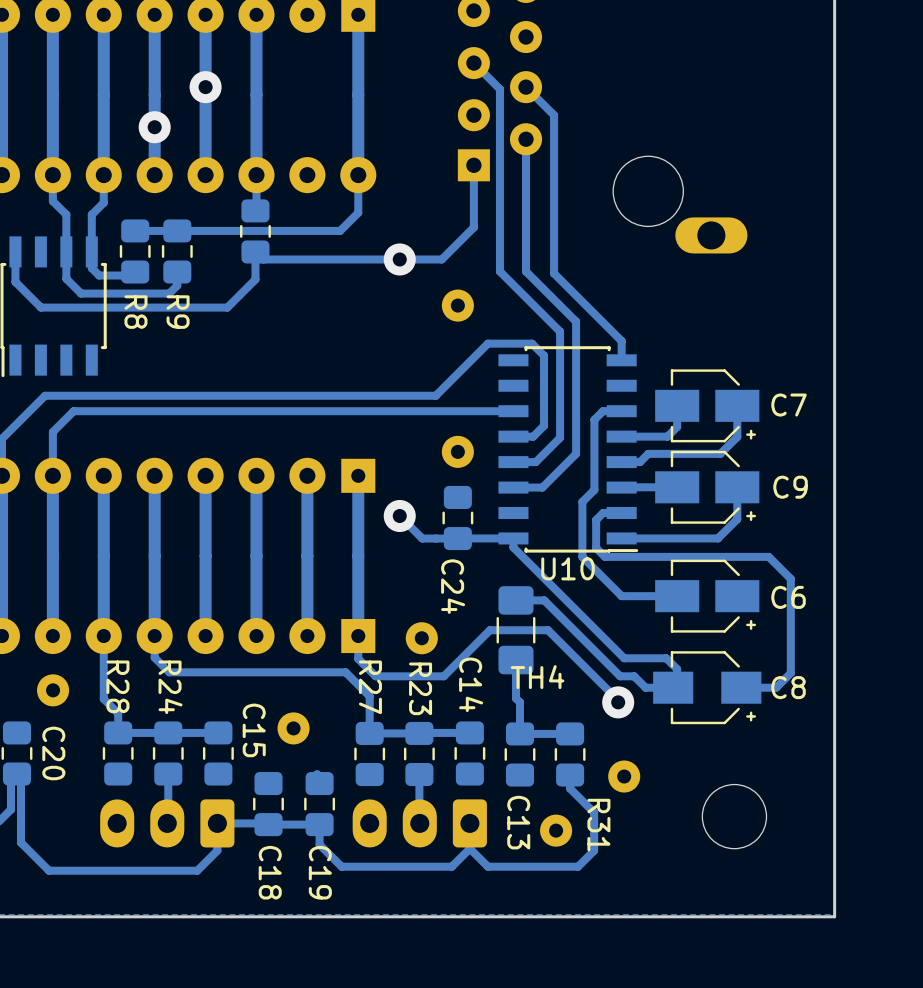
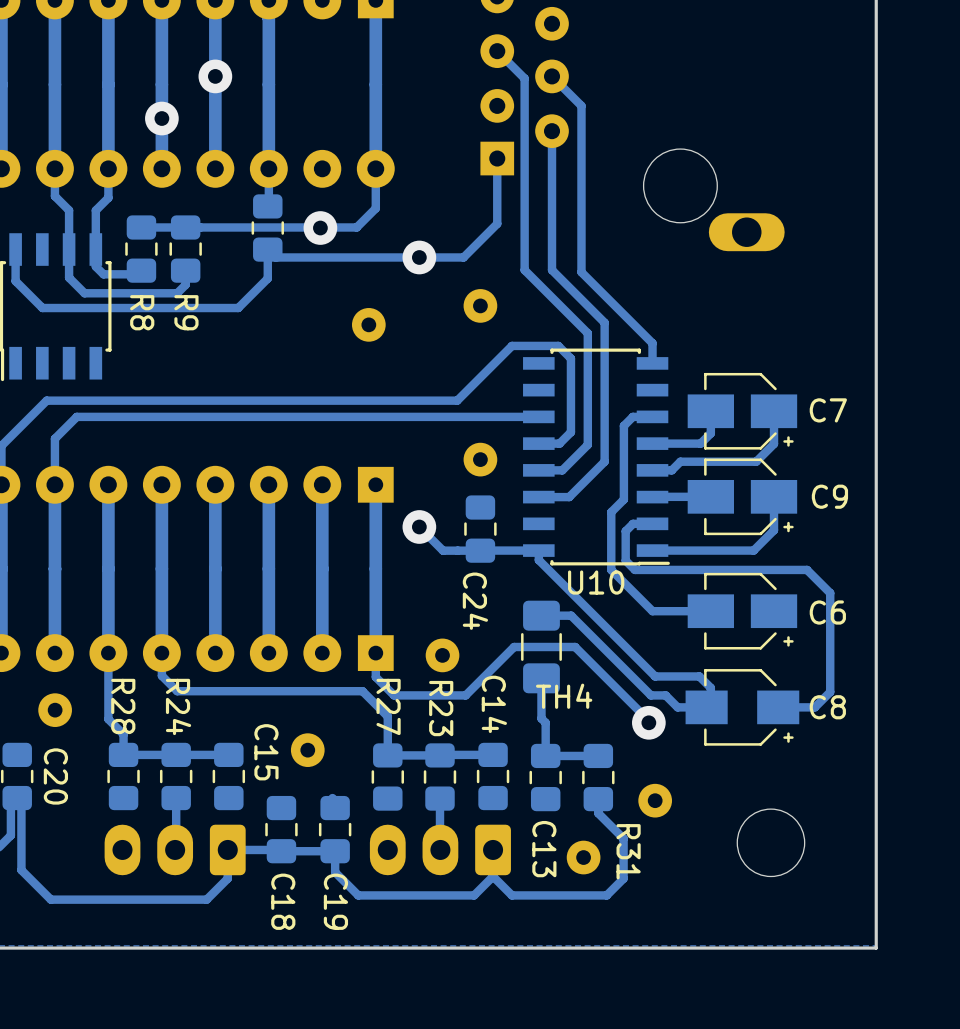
via: none -> (320, 228)
part: none -> (368, 324)

